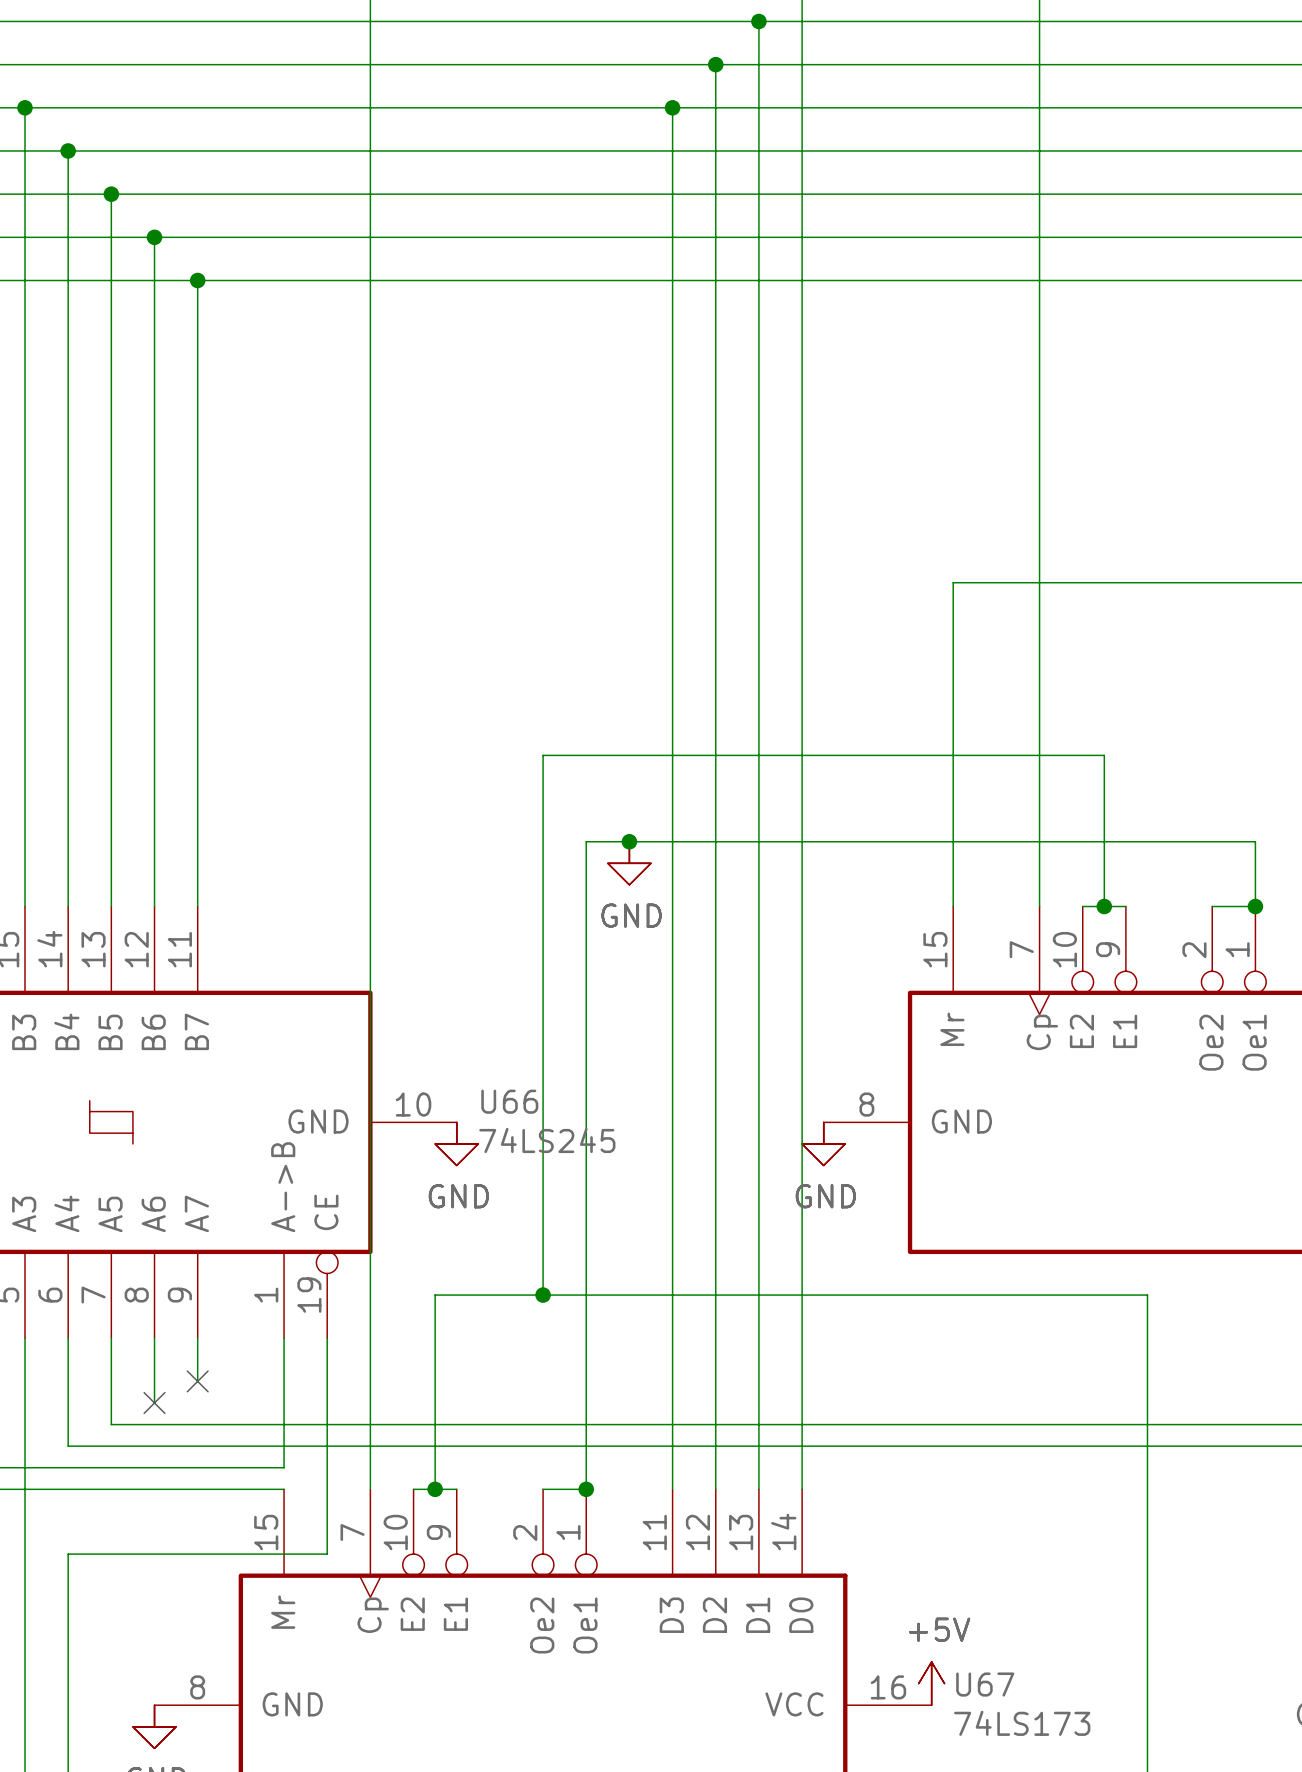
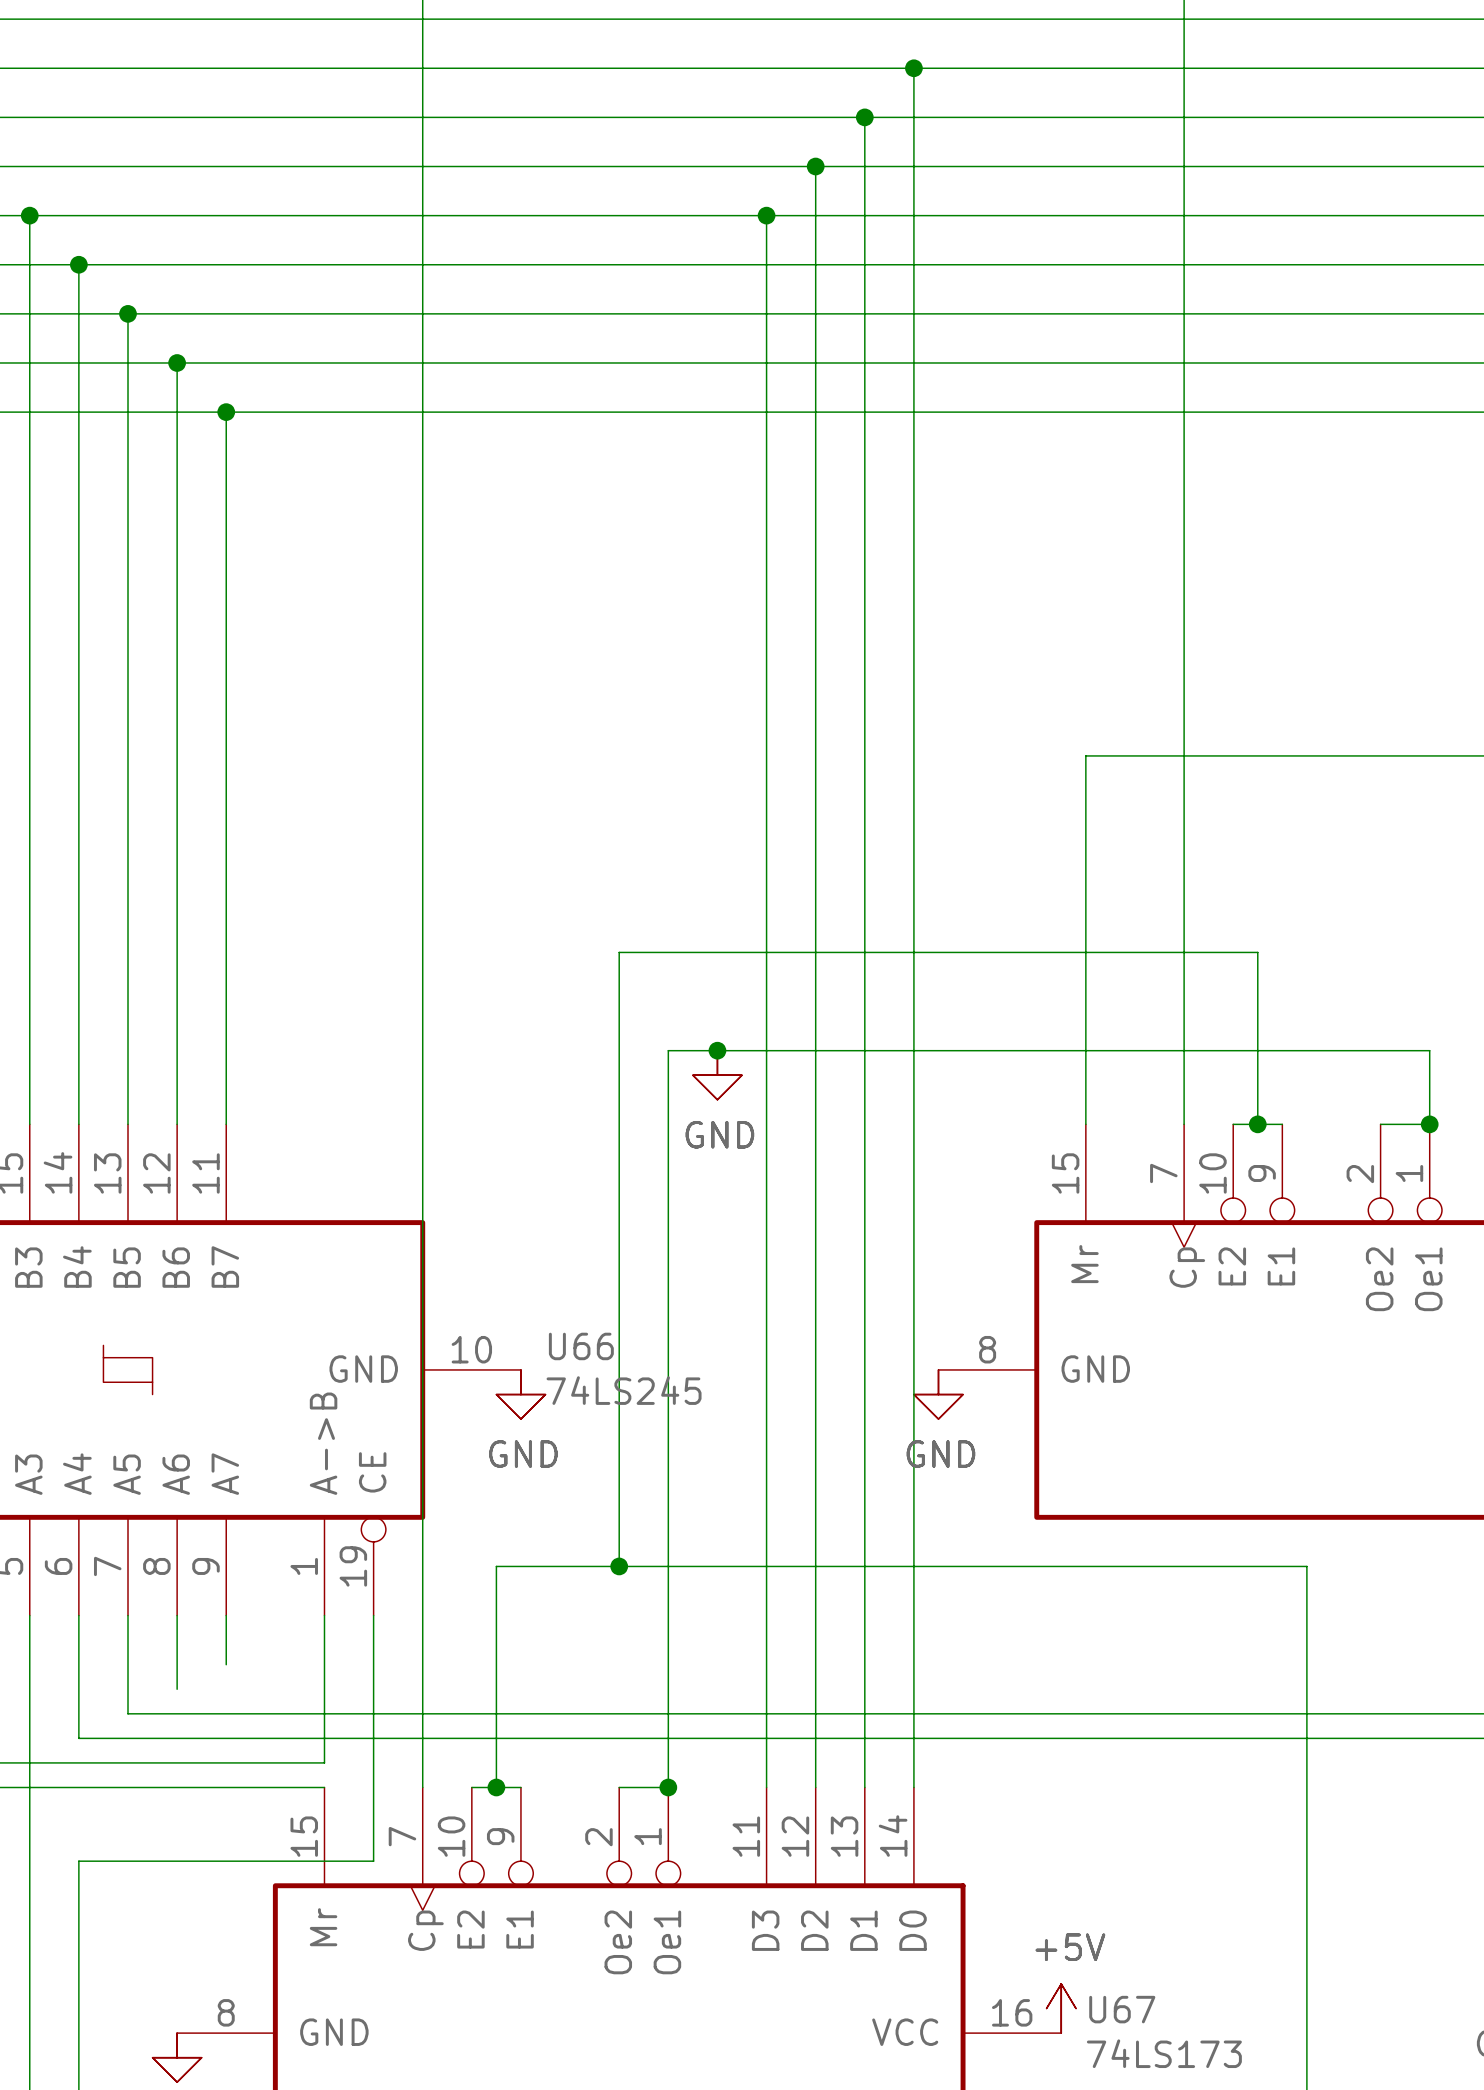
no-connect mark: (197, 1381) -> none
no-connect mark: (154, 1402) -> none

